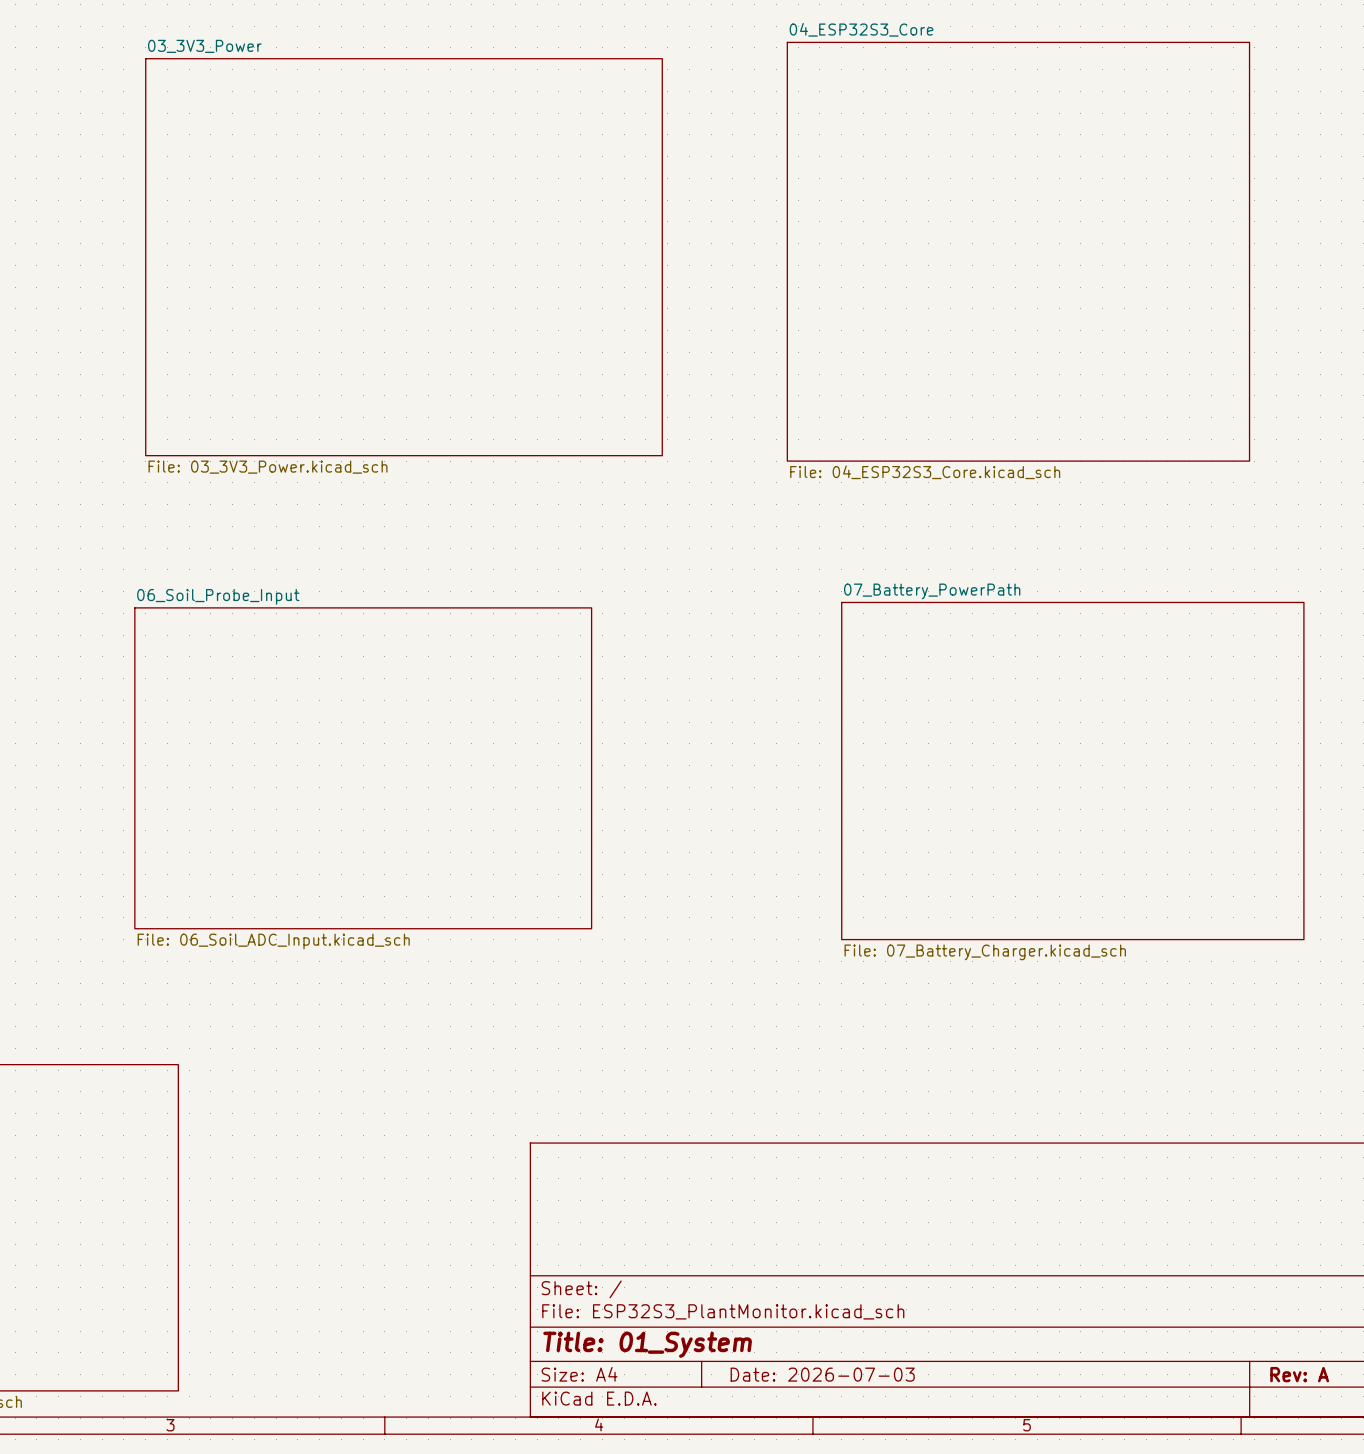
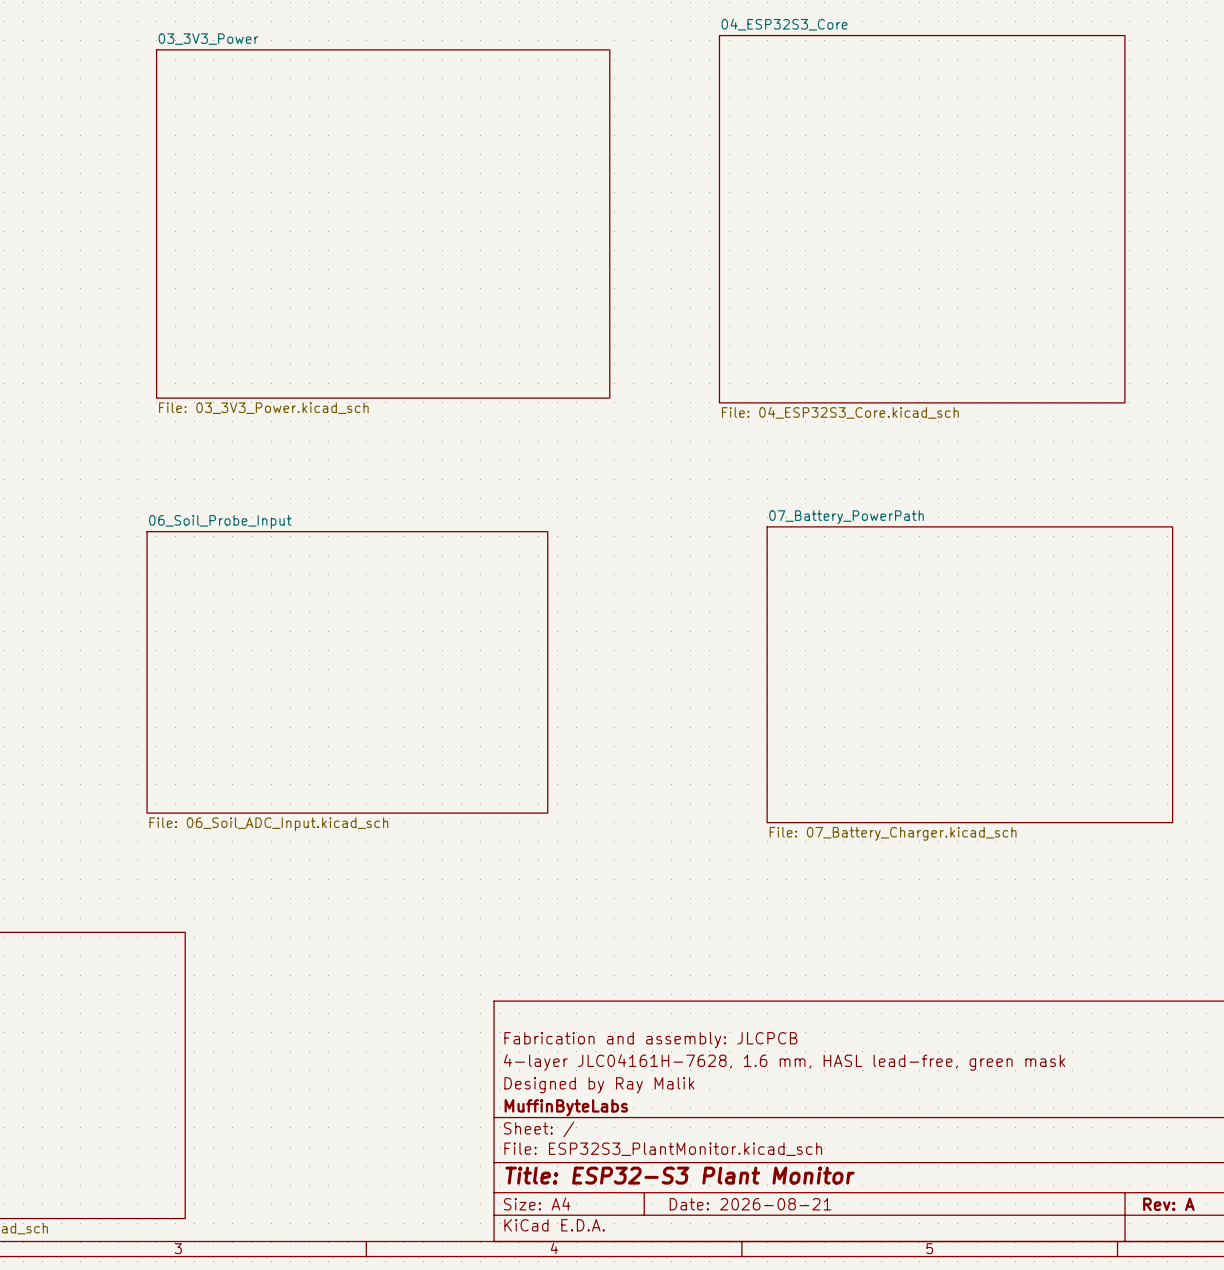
title block: none -> Fabrication and assembly: JLCPCB (650, 1040)
title block: none -> 4-layer JLC04161H-7628, 1.6 mm, HASL lead-free, green mask (784, 1062)
title block: none -> Designed by Ray Malik (599, 1085)
title block: none -> MuffinByteLabs (566, 1107)
title block: Title: 01_System (647, 1344) -> Title: ESP32-S3 Plant Monitor (680, 1175)
title block: Date: 2026-07-03 (822, 1374) -> Date: 2026-08-21 (750, 1204)

